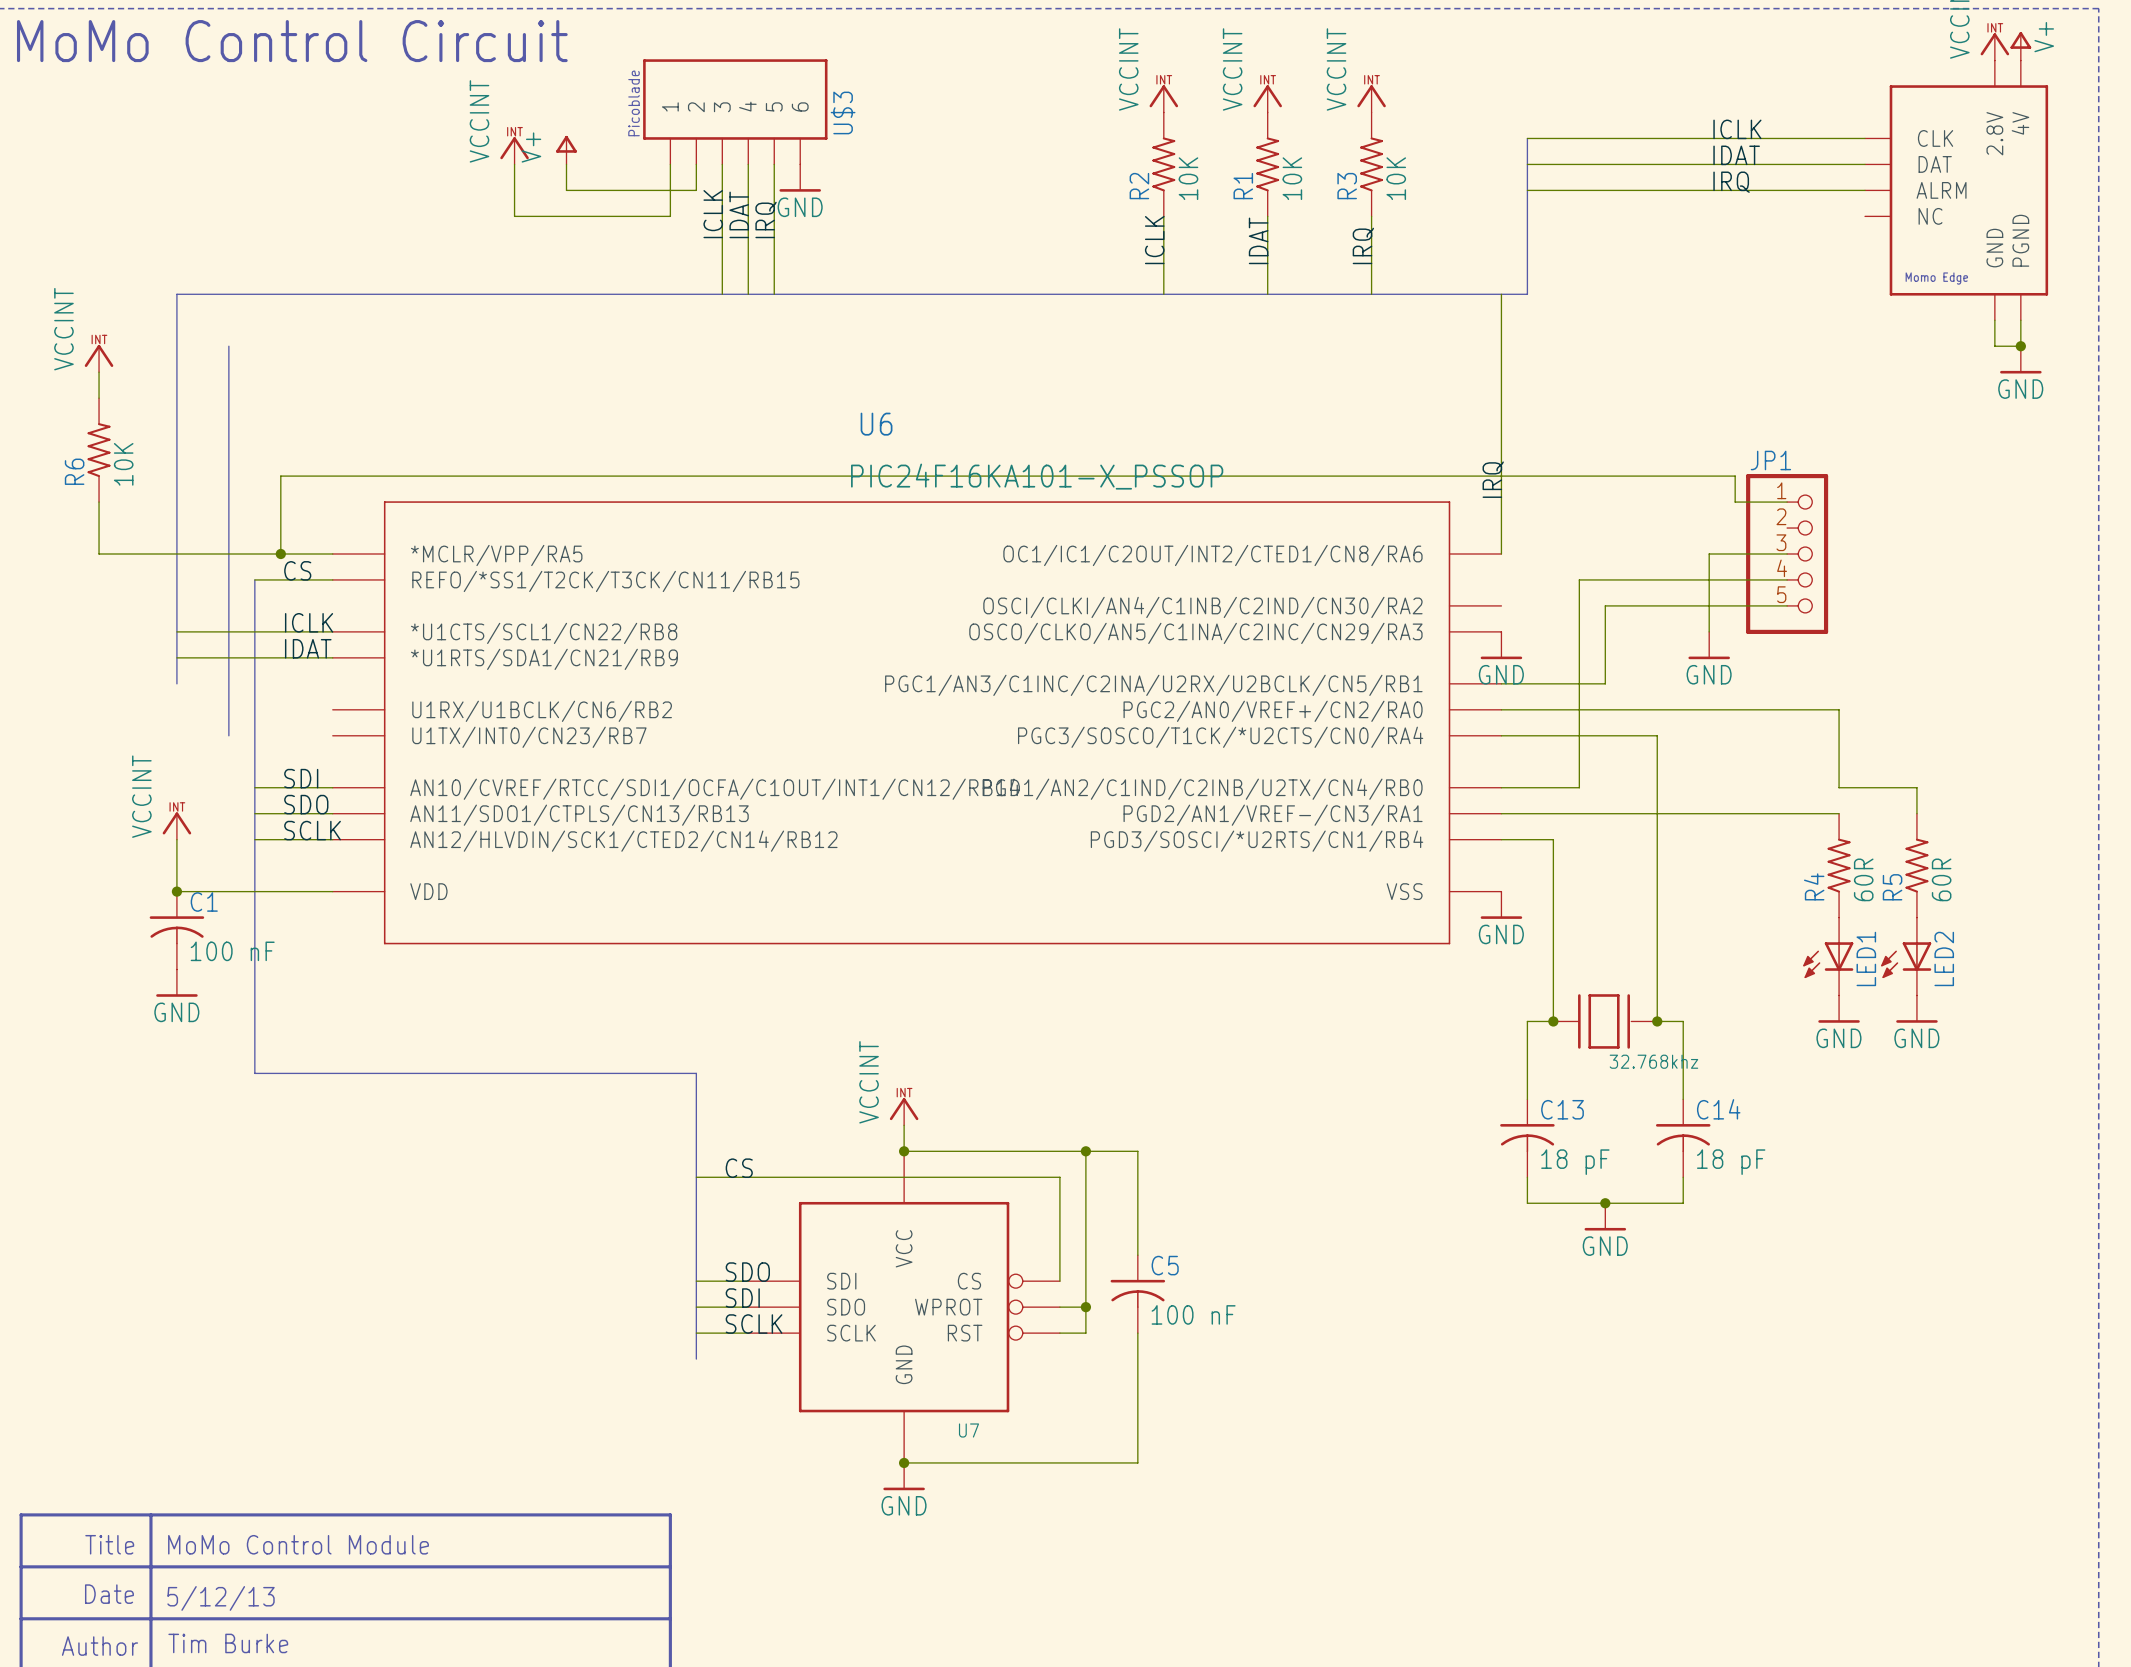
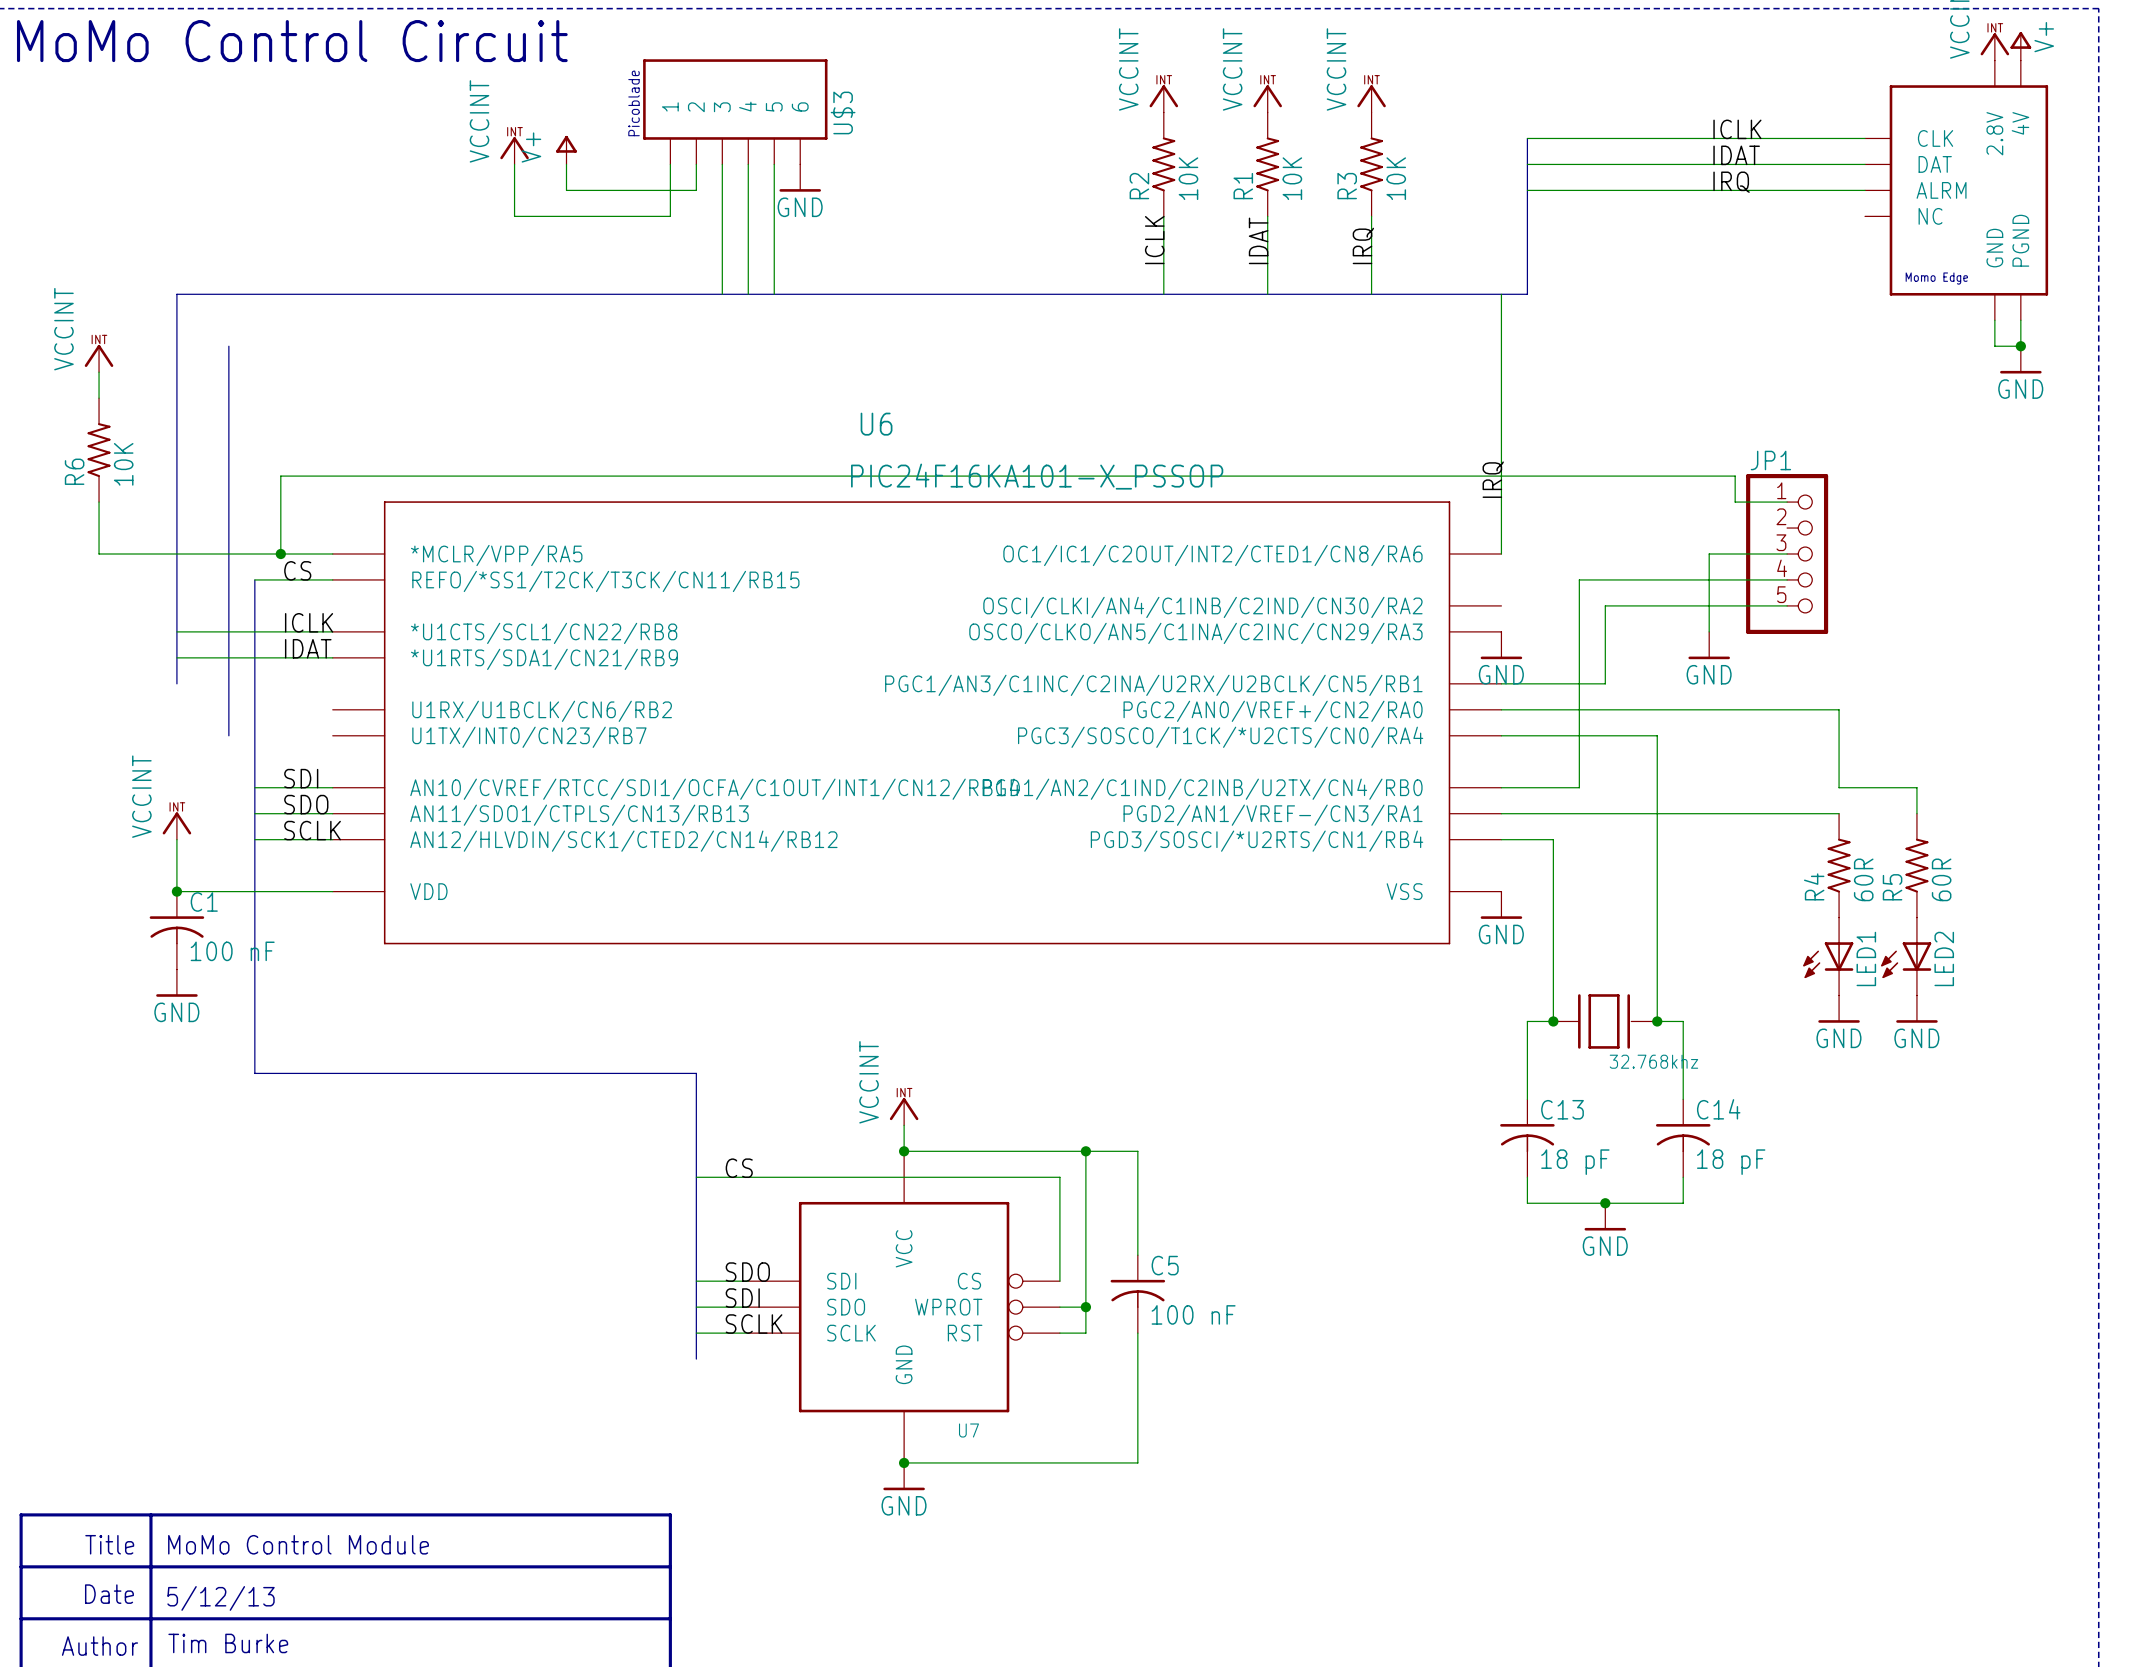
label: ICLK (713, 214) -> none
label: IDAT (739, 214) -> none
label: IRQ (766, 219) -> none

